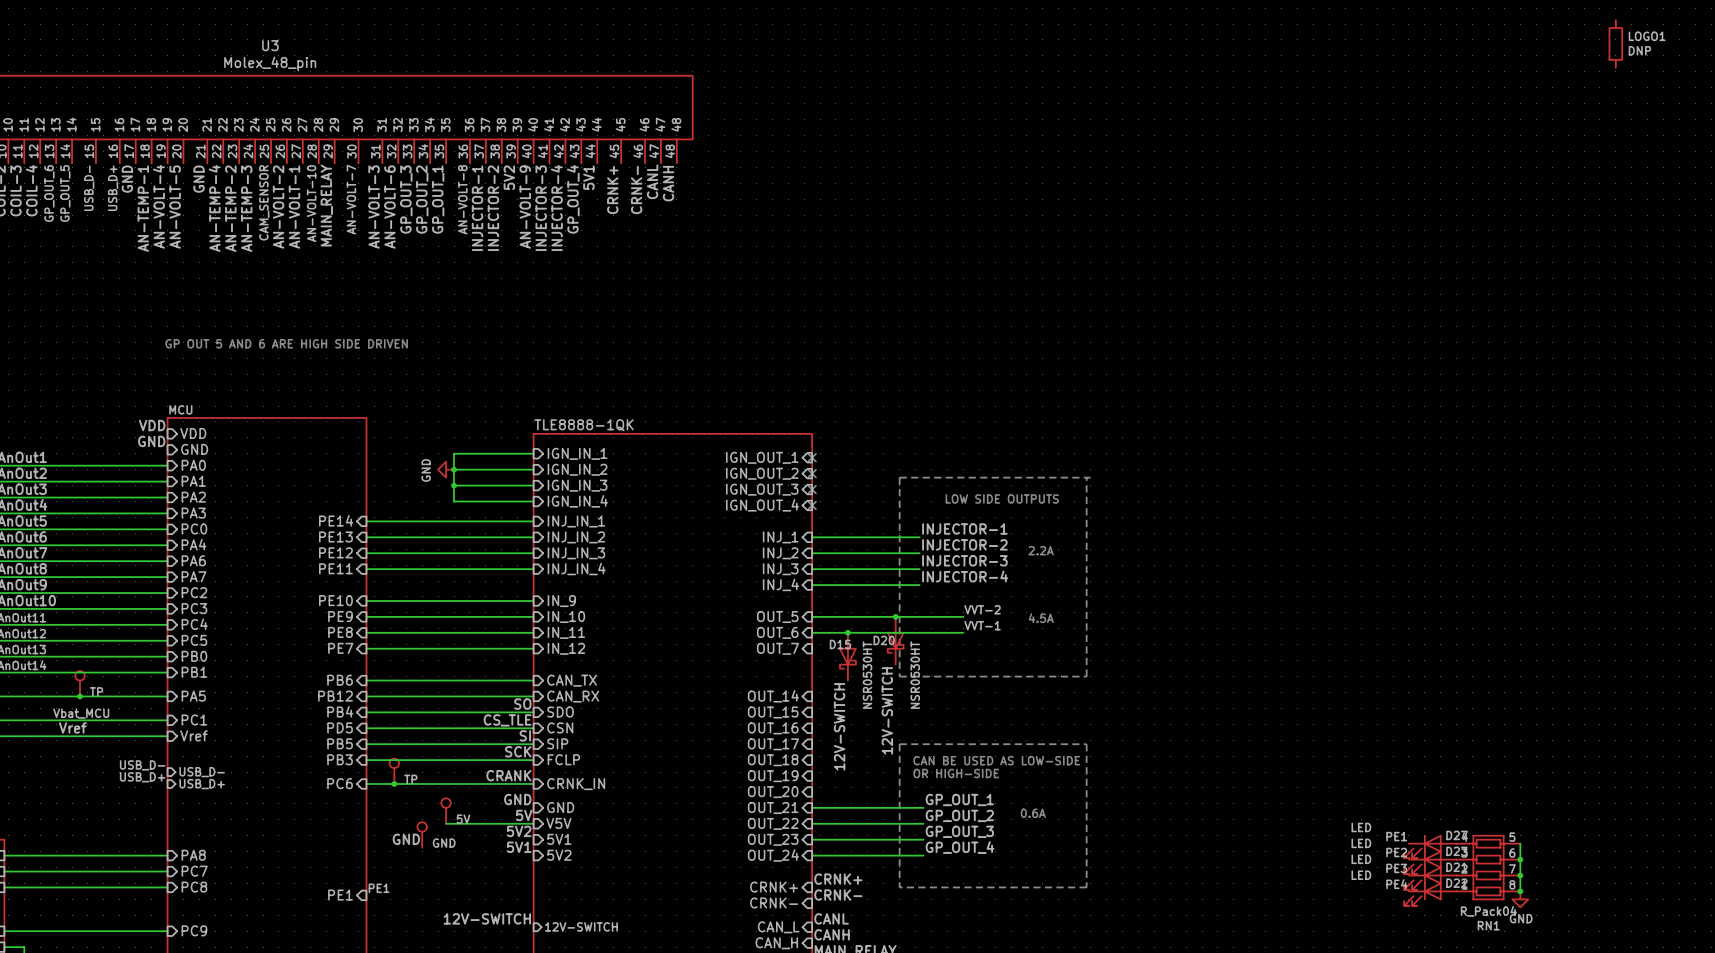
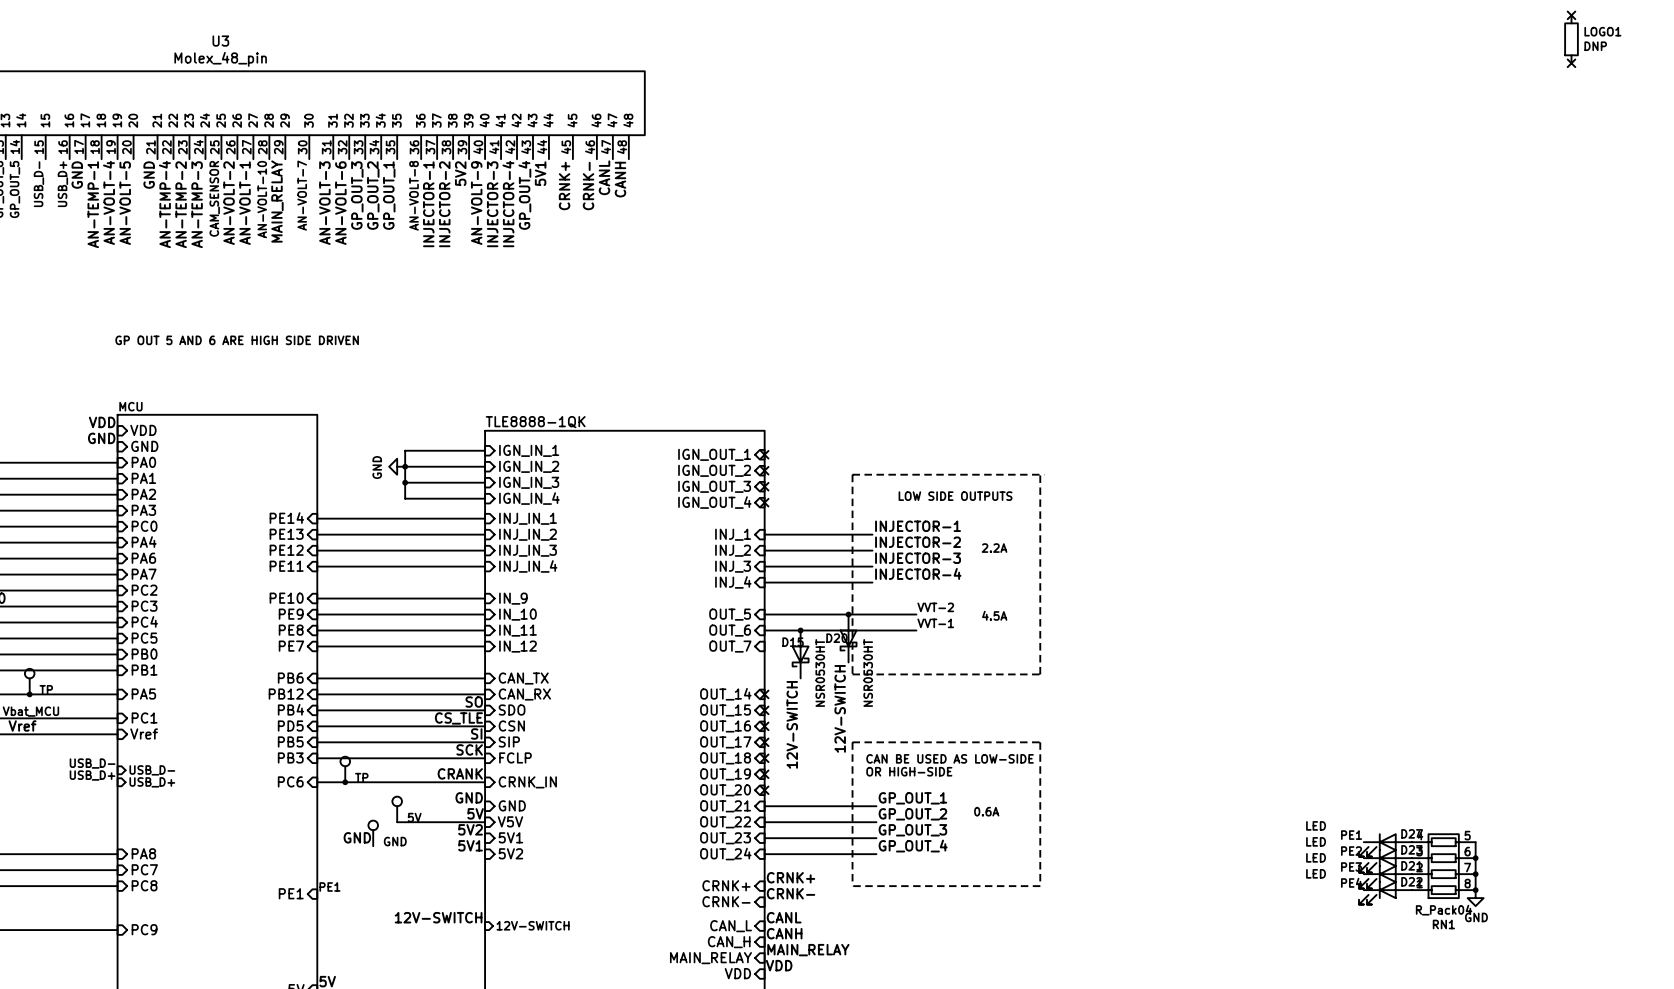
no-connect mark: none -> (1571, 15)
no-connect mark: none -> (1571, 63)
no-connect mark: none -> (764, 694)
no-connect mark: none -> (764, 710)
no-connect mark: none -> (764, 726)
no-connect mark: none -> (764, 742)
no-connect mark: none -> (764, 758)
no-connect mark: none -> (764, 774)
no-connect mark: none -> (764, 790)

